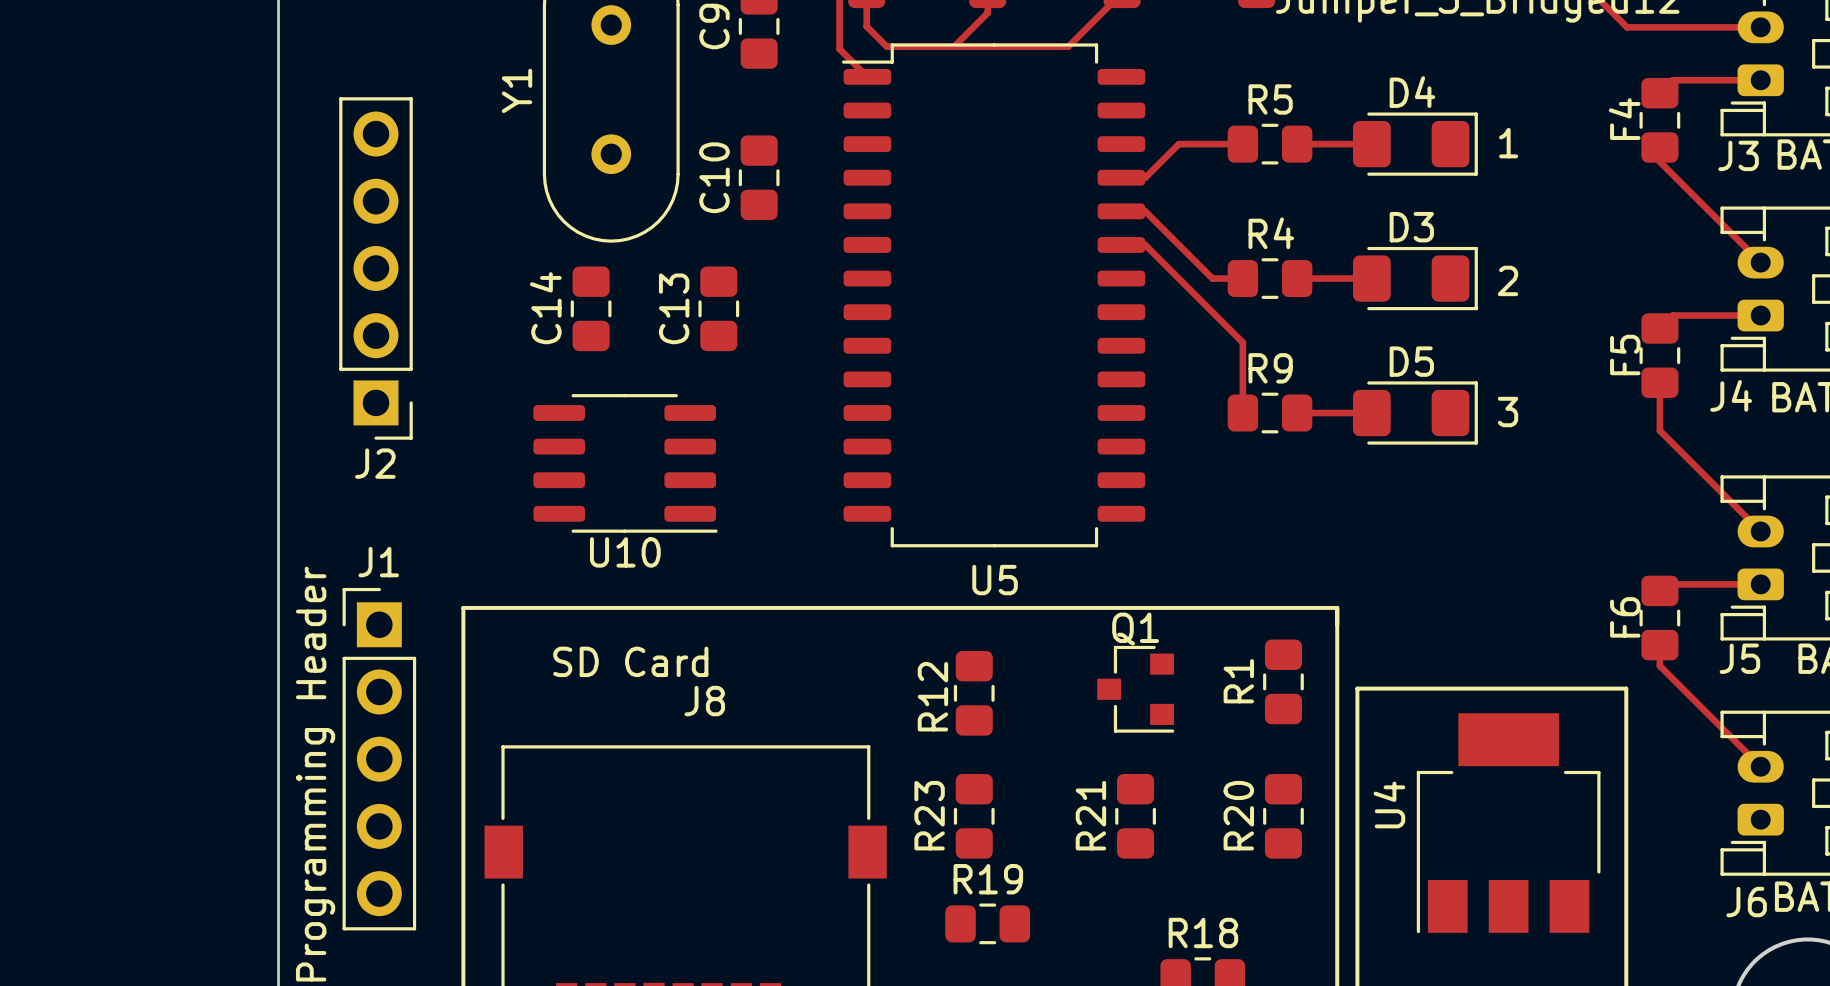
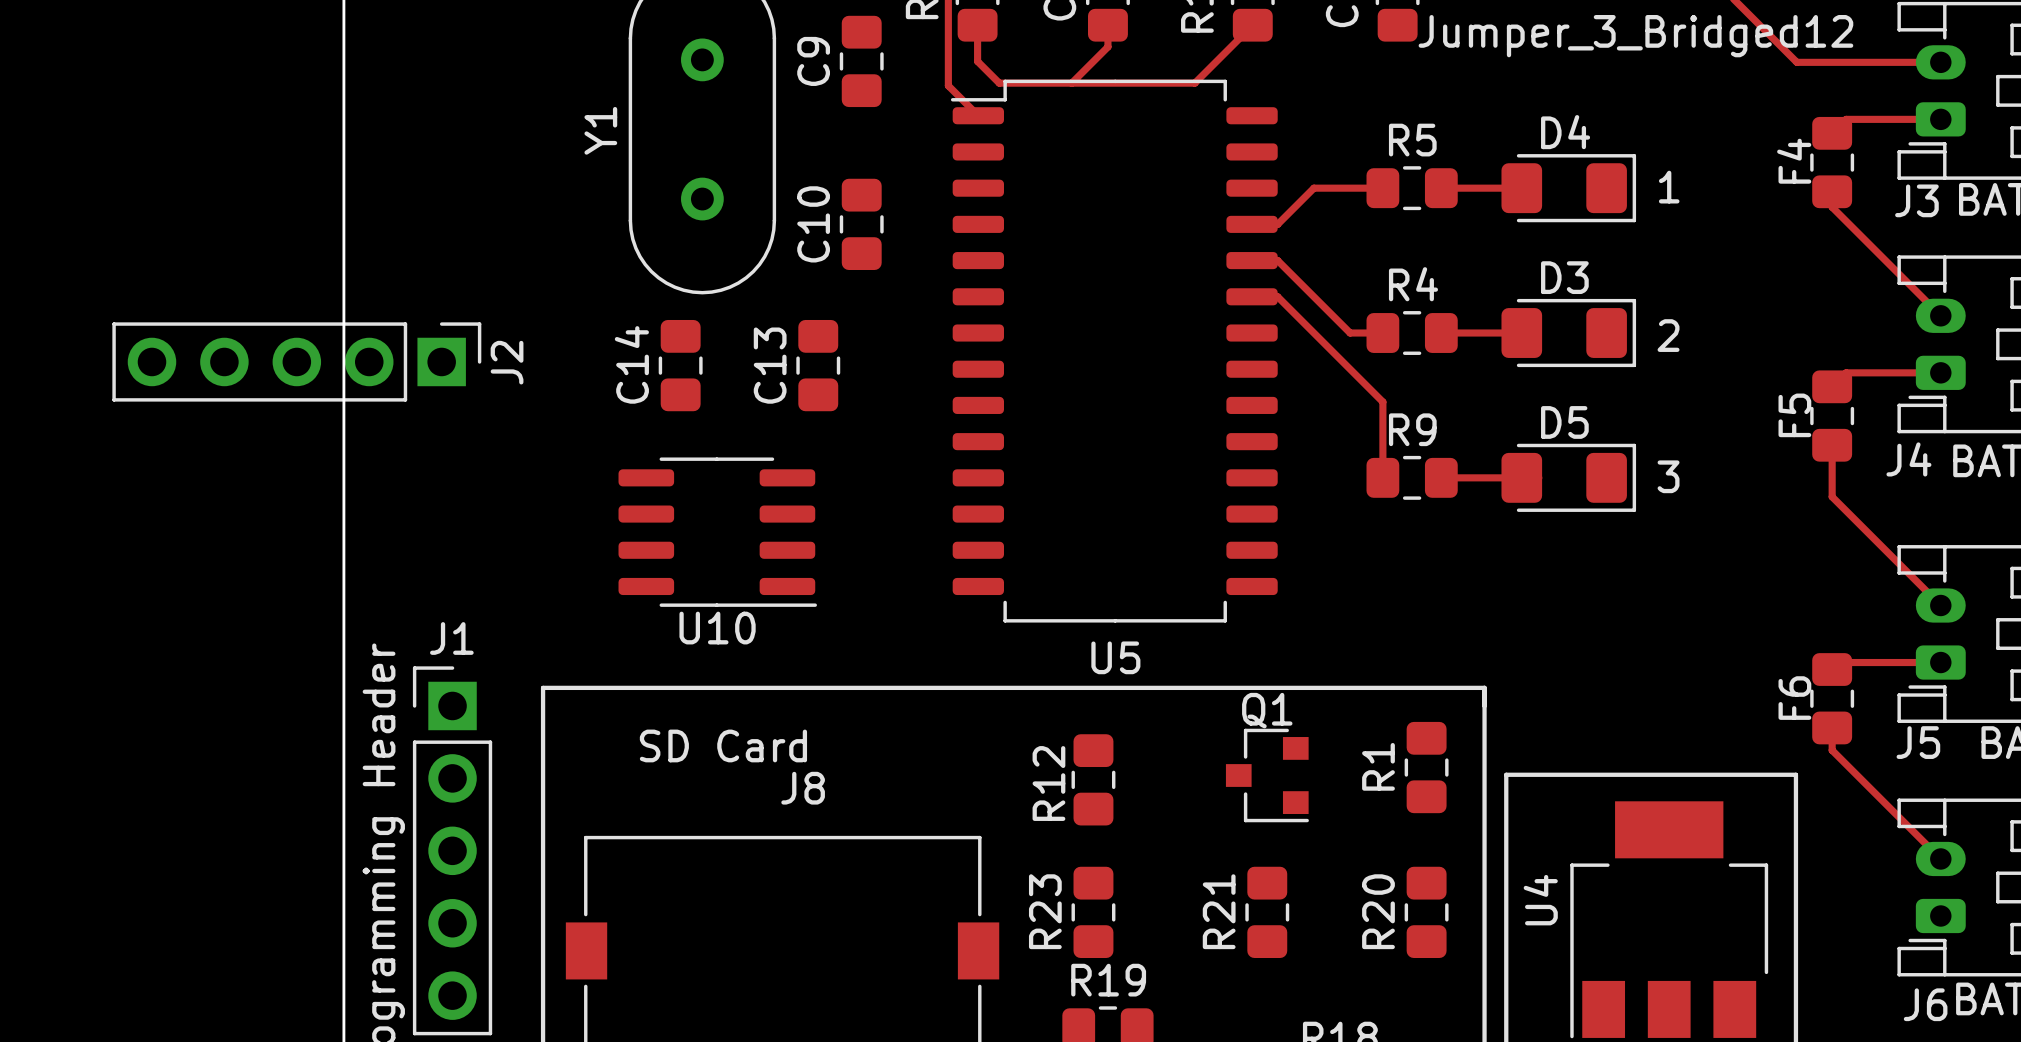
J2 rotation: 0° (376, 268) -> 90° counterclockwise (296, 361)

